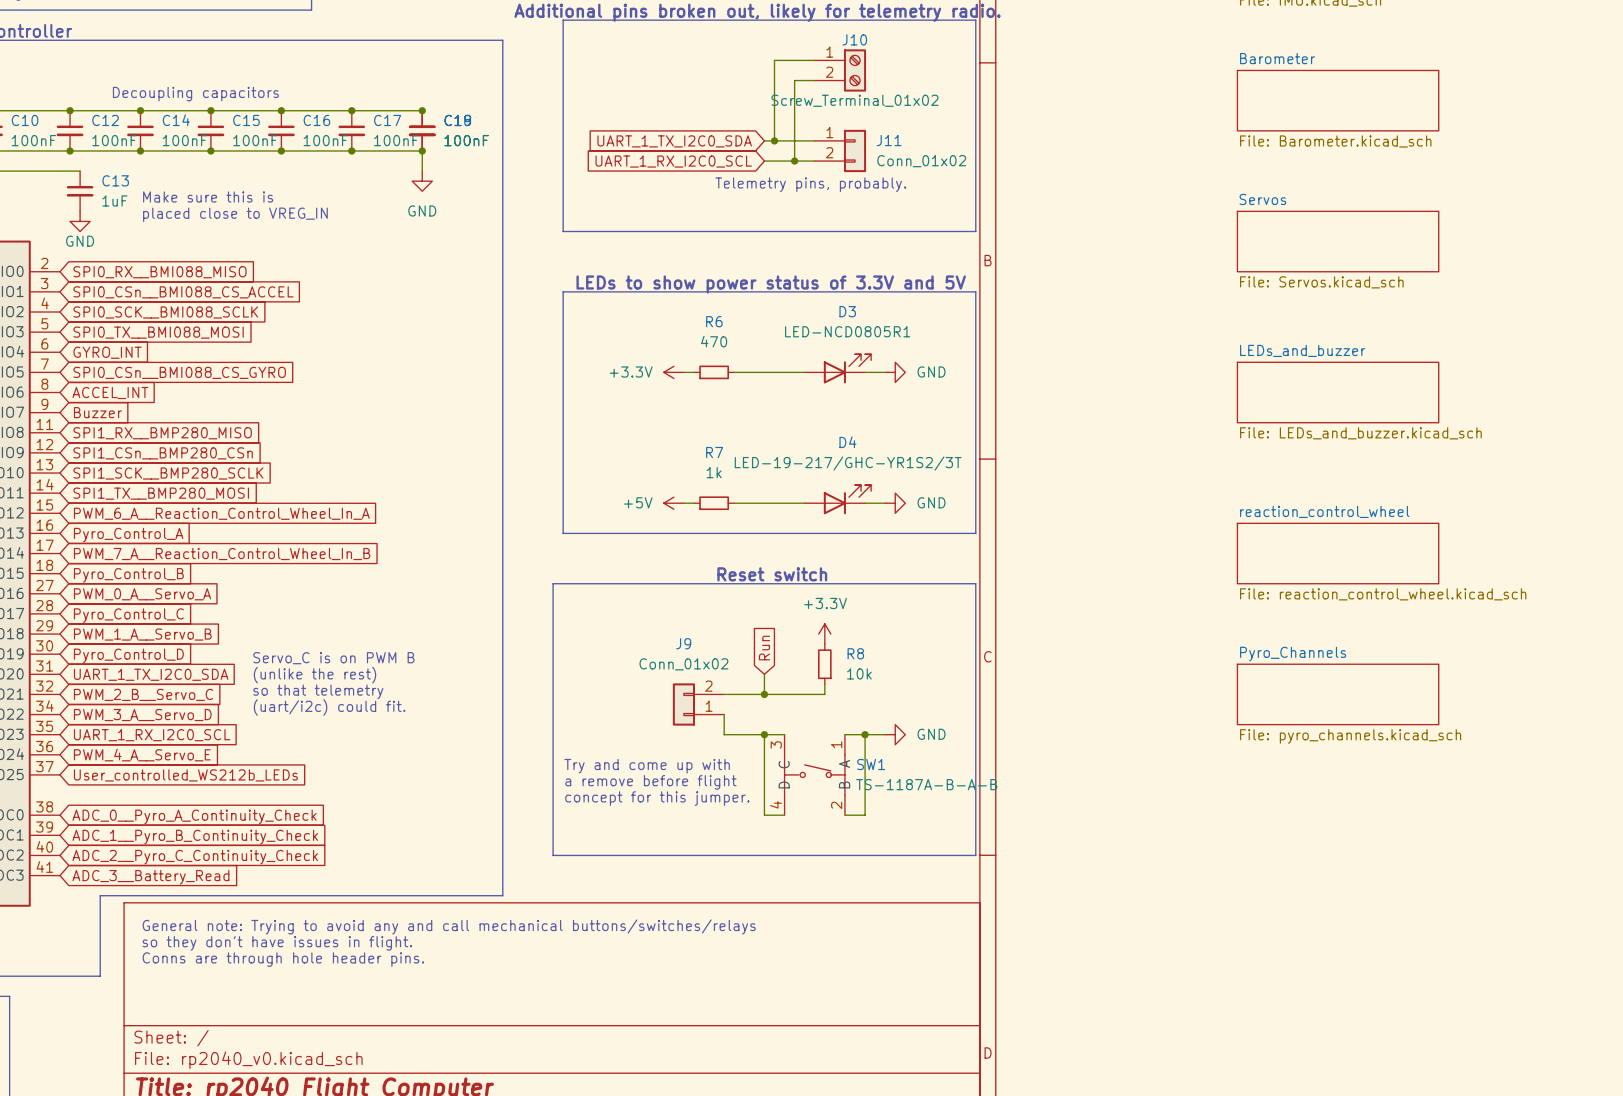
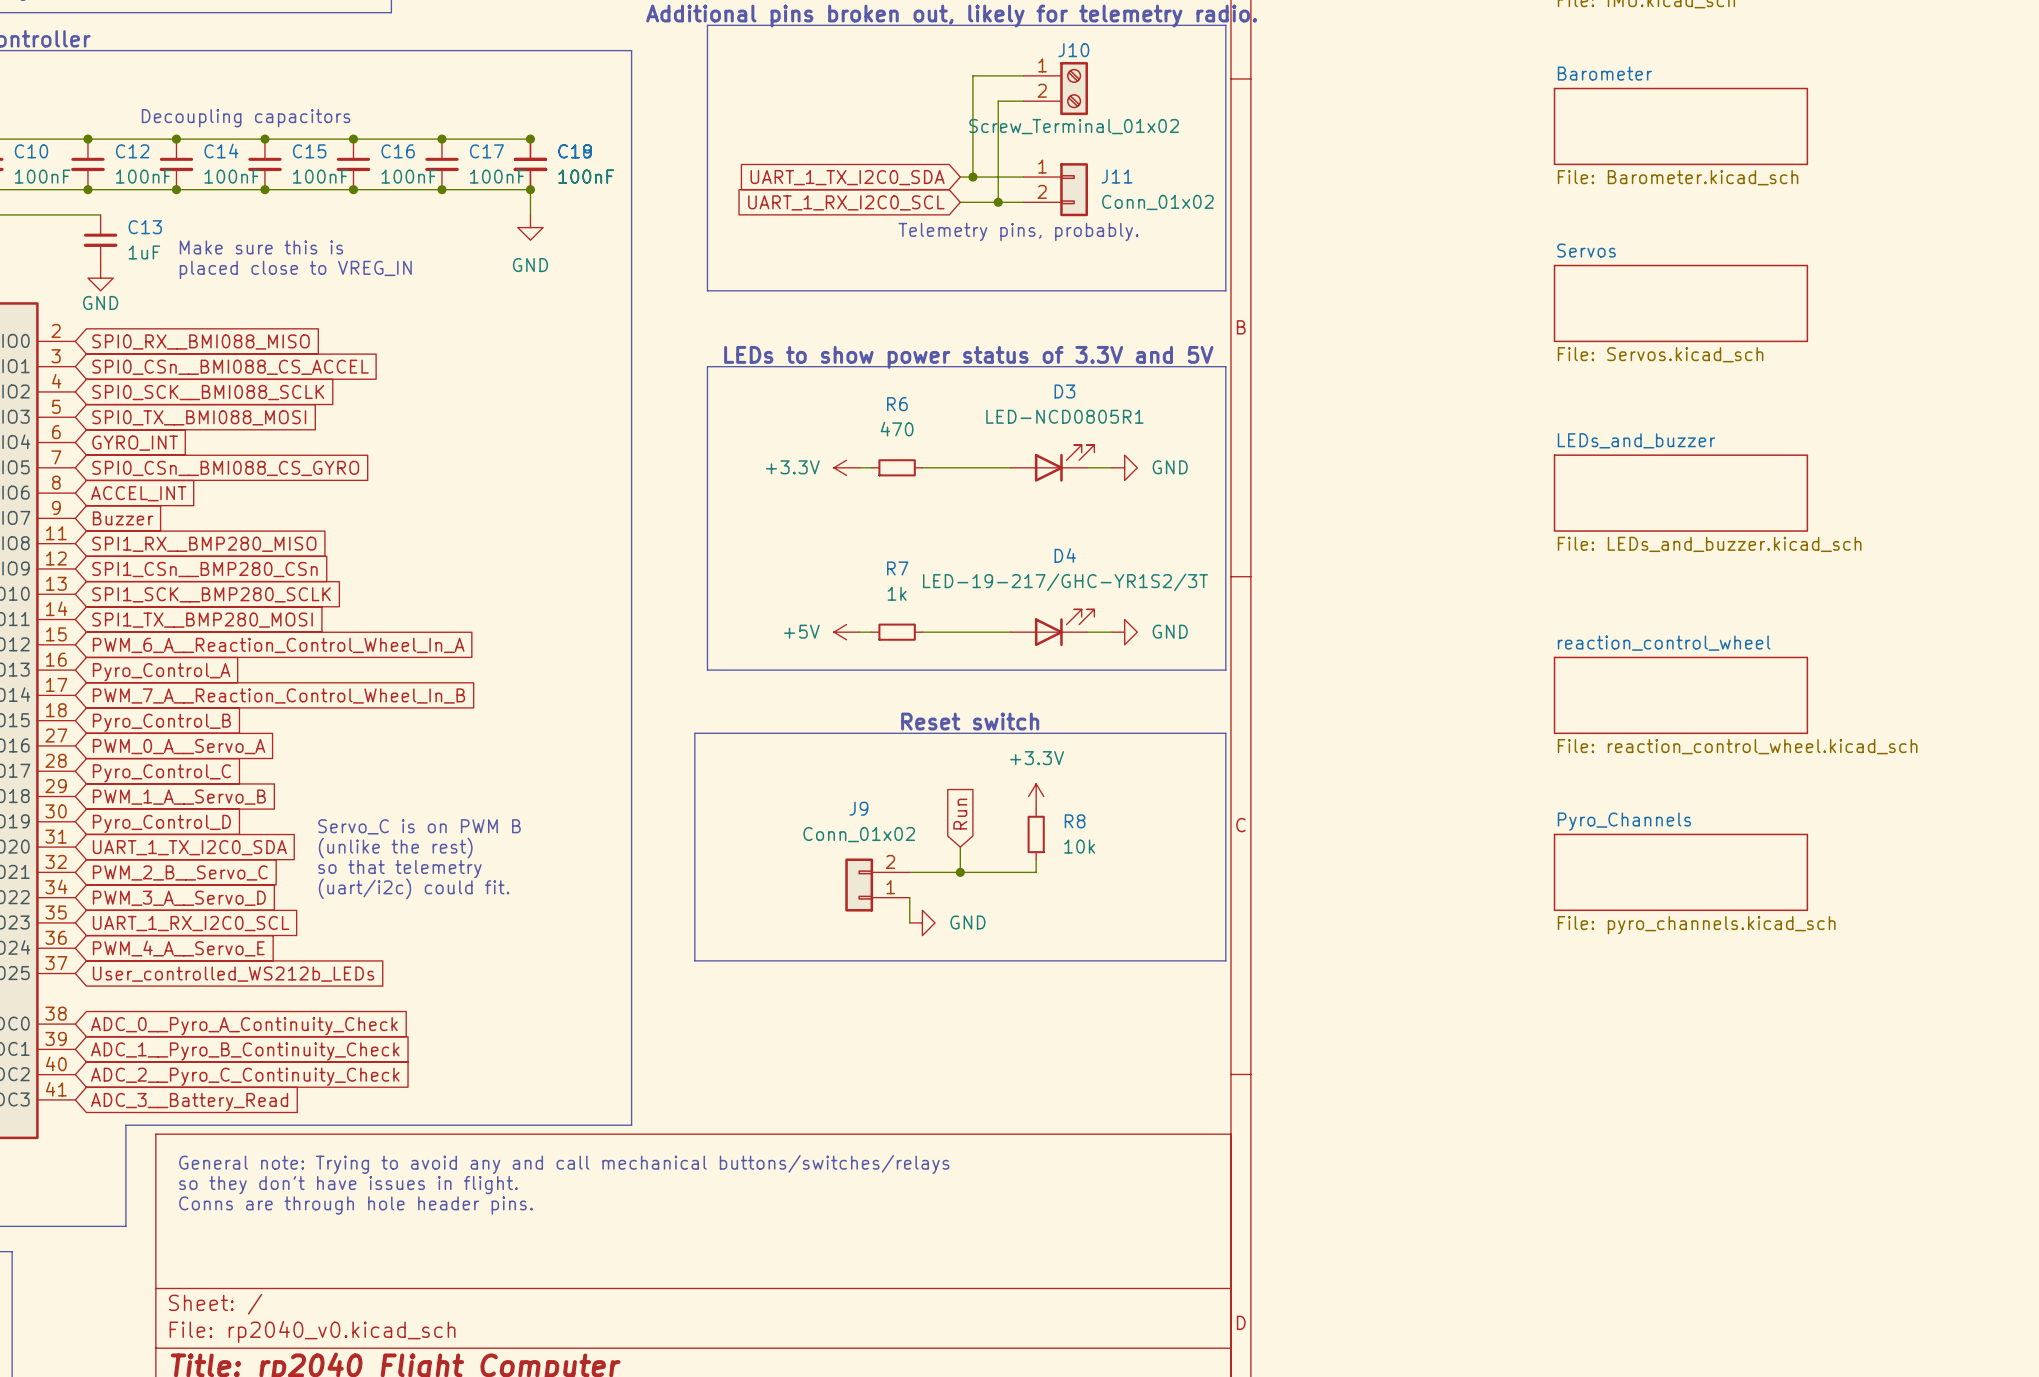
wire: (724, 734) (784, 734) -> none
wire: (764, 734) (764, 815) (784, 815) -> none
junction: (764, 734) -> none
wire: (844, 734) (885, 734) -> none
wire: (865, 734) (865, 815) (844, 815) -> none
junction: (865, 734) -> none
power symbol position: GND (895, 734) -> GND (922, 922)
line: (553, 764) (553, 855) (975, 855) (975, 764) -> (694, 960) (1225, 960)
text: Try and come up with (647, 766) -> none
SW1: TS-1187A-B-A-B (814, 774) -> none
text: a remove before flight (650, 782) -> none
text: concept for this jumper. (657, 798) -> none

